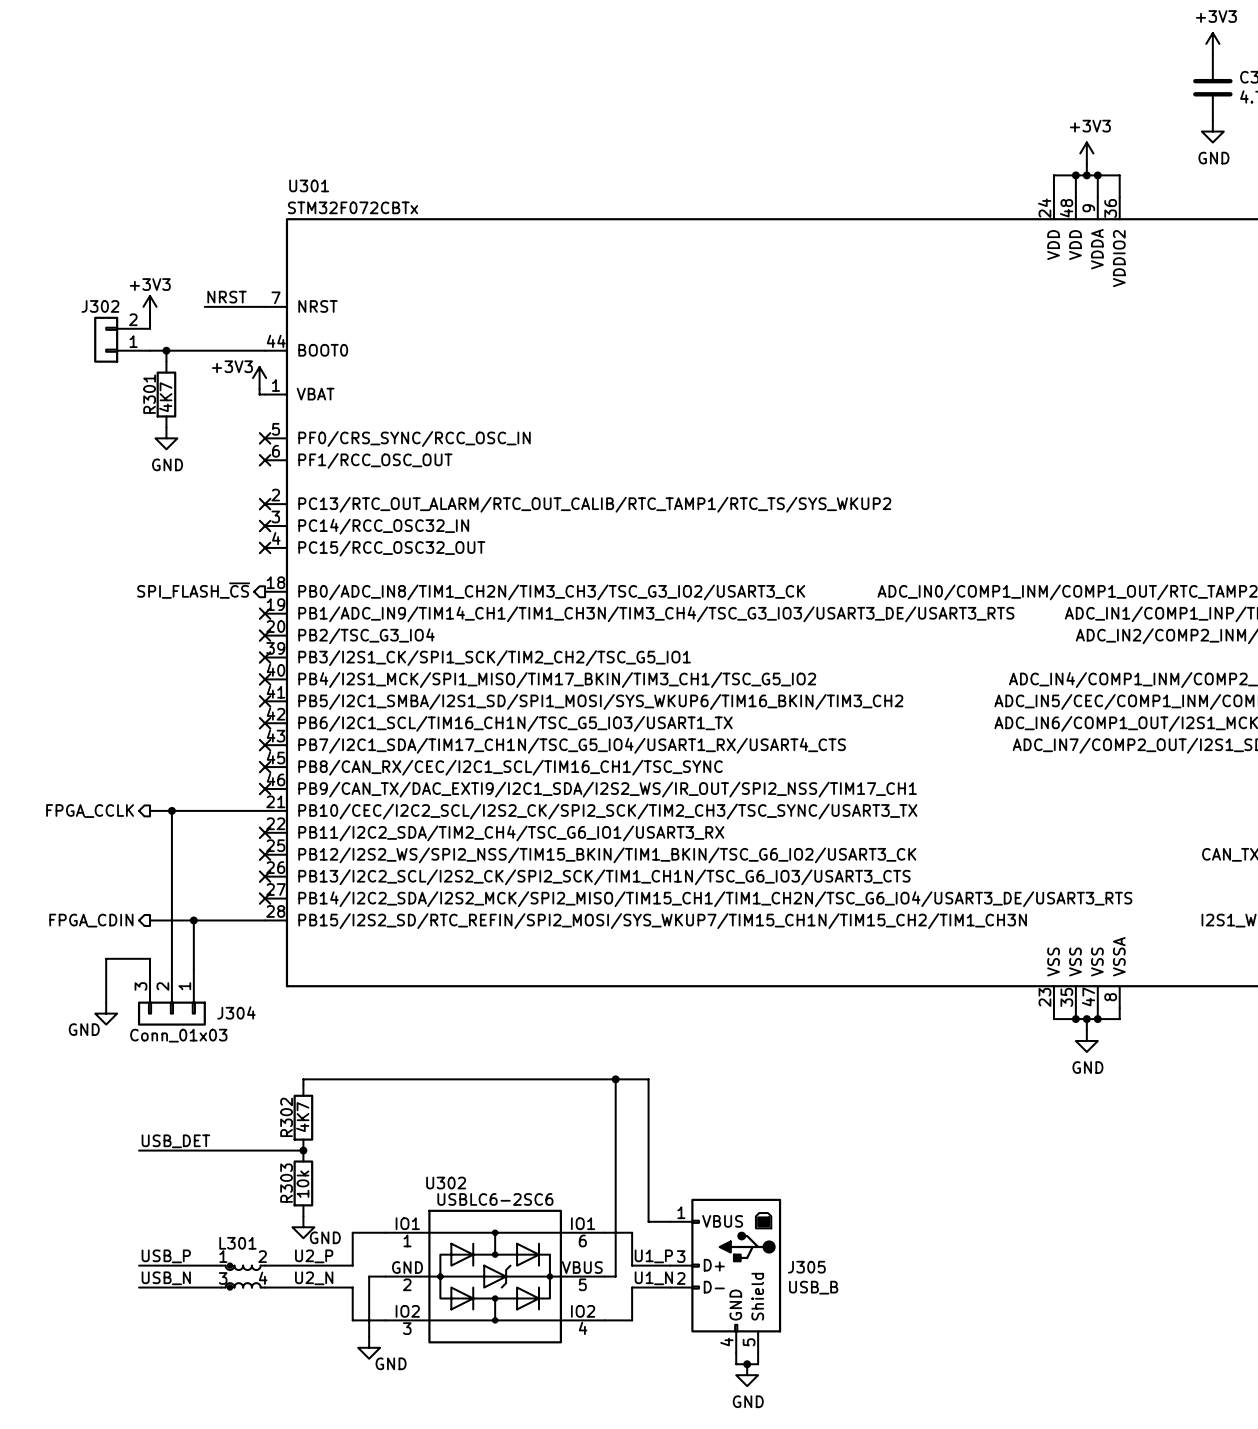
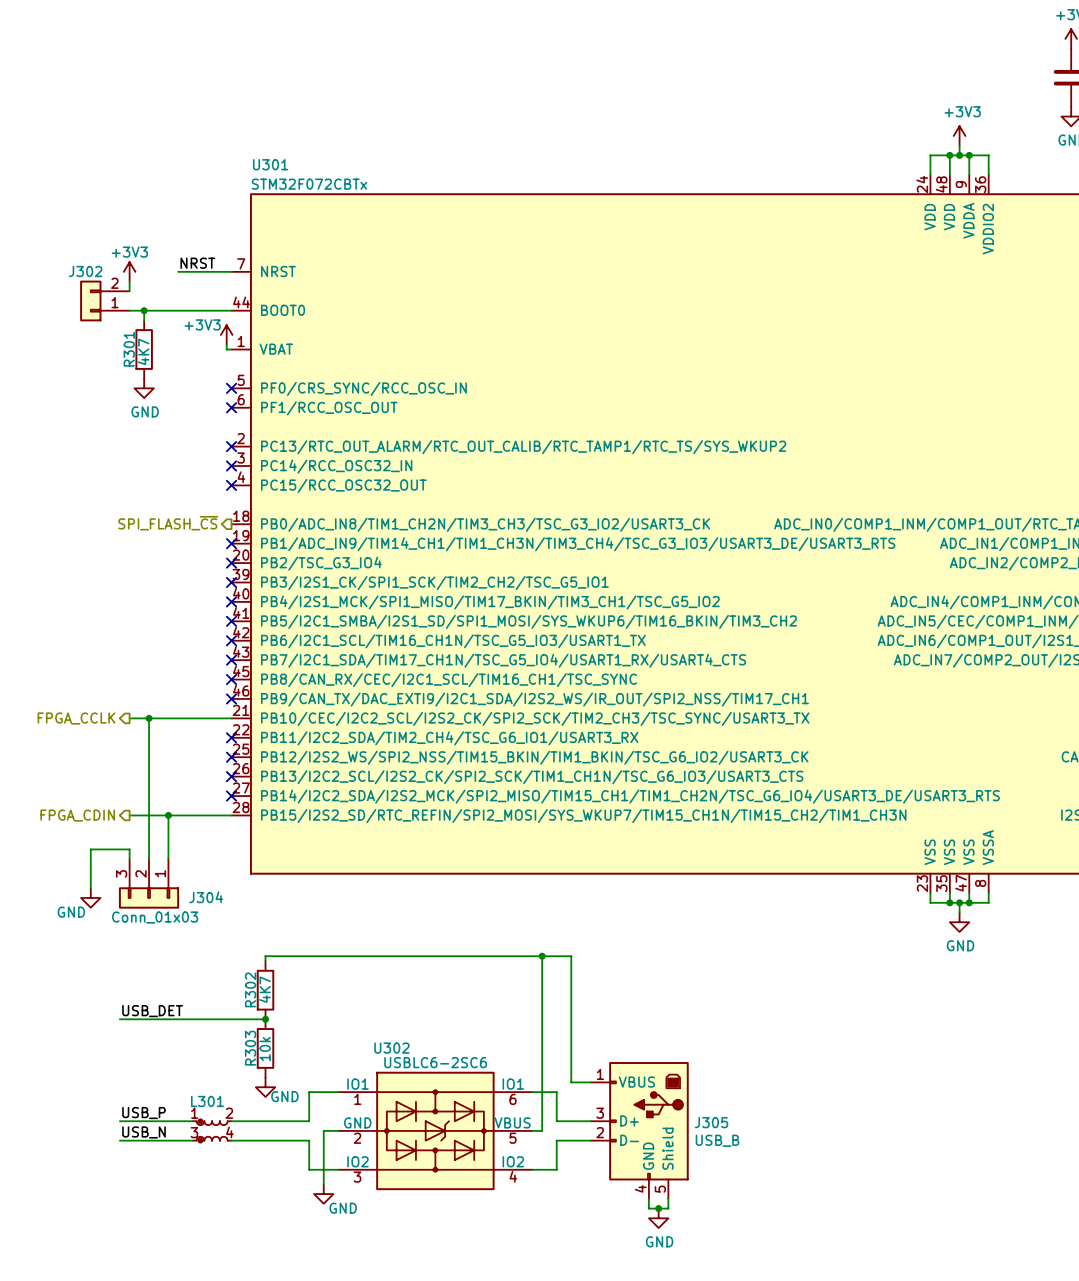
label: U2_P (314, 1256) -> none
label: U1_P (653, 1256) -> none
label: U2_N (314, 1278) -> none
label: U1_N (653, 1278) -> none

